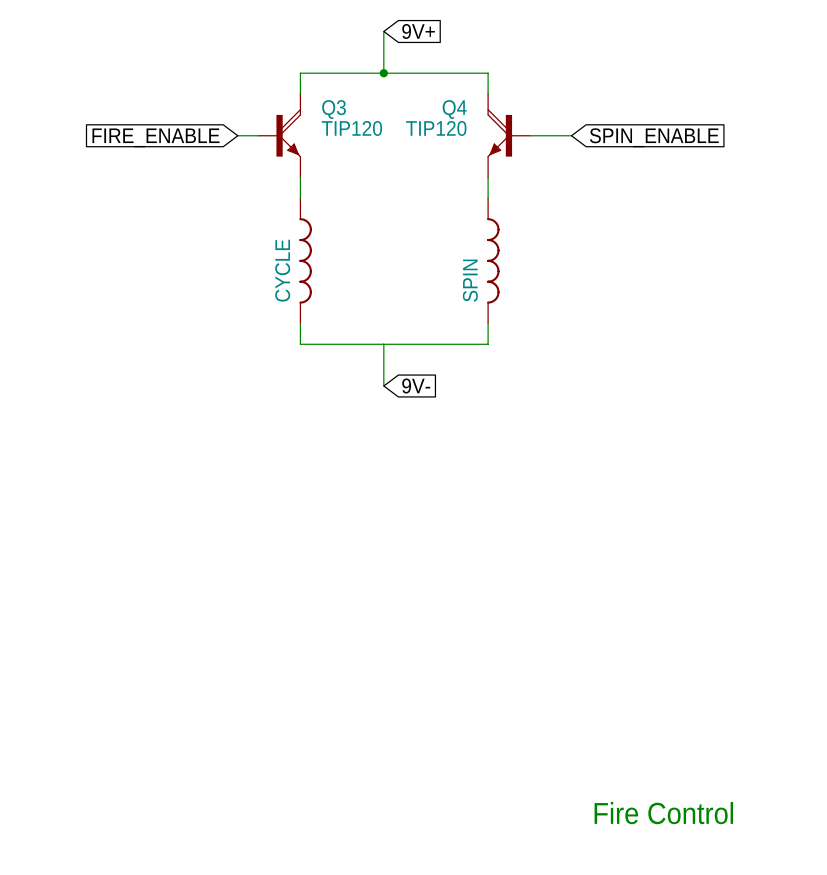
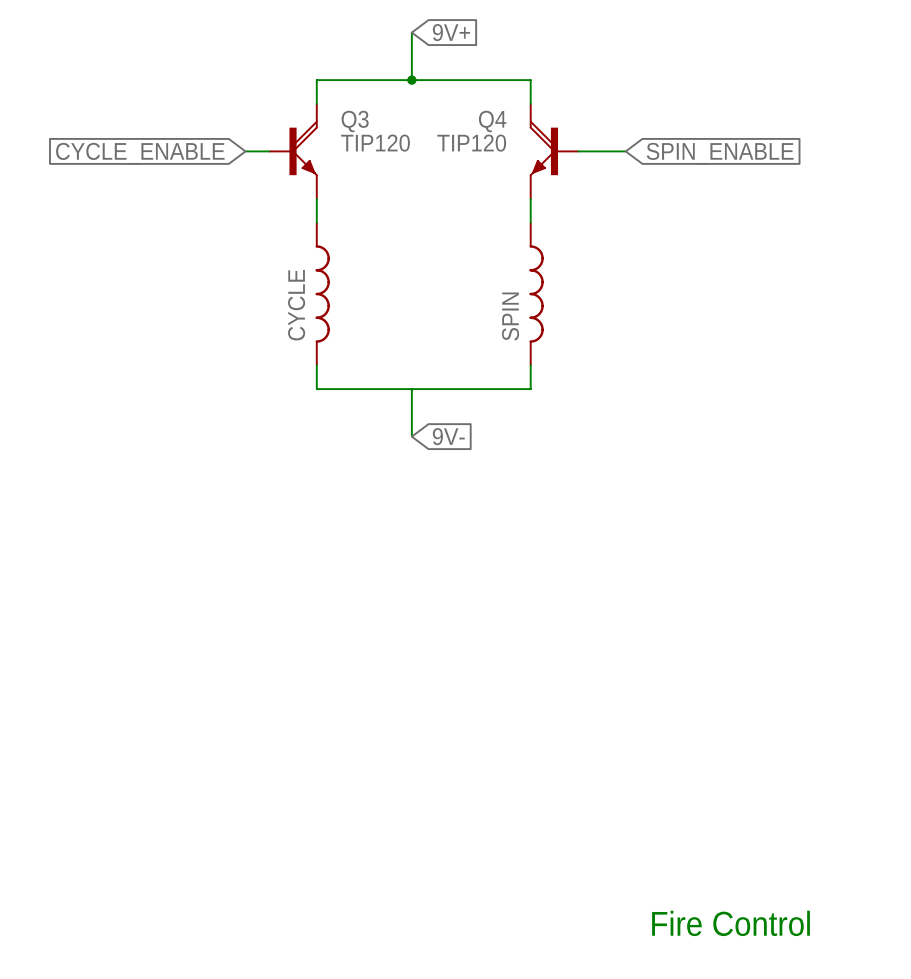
global label: FIRE_ENABLE (155, 137) -> CYCLE_ENABLE (140, 153)

